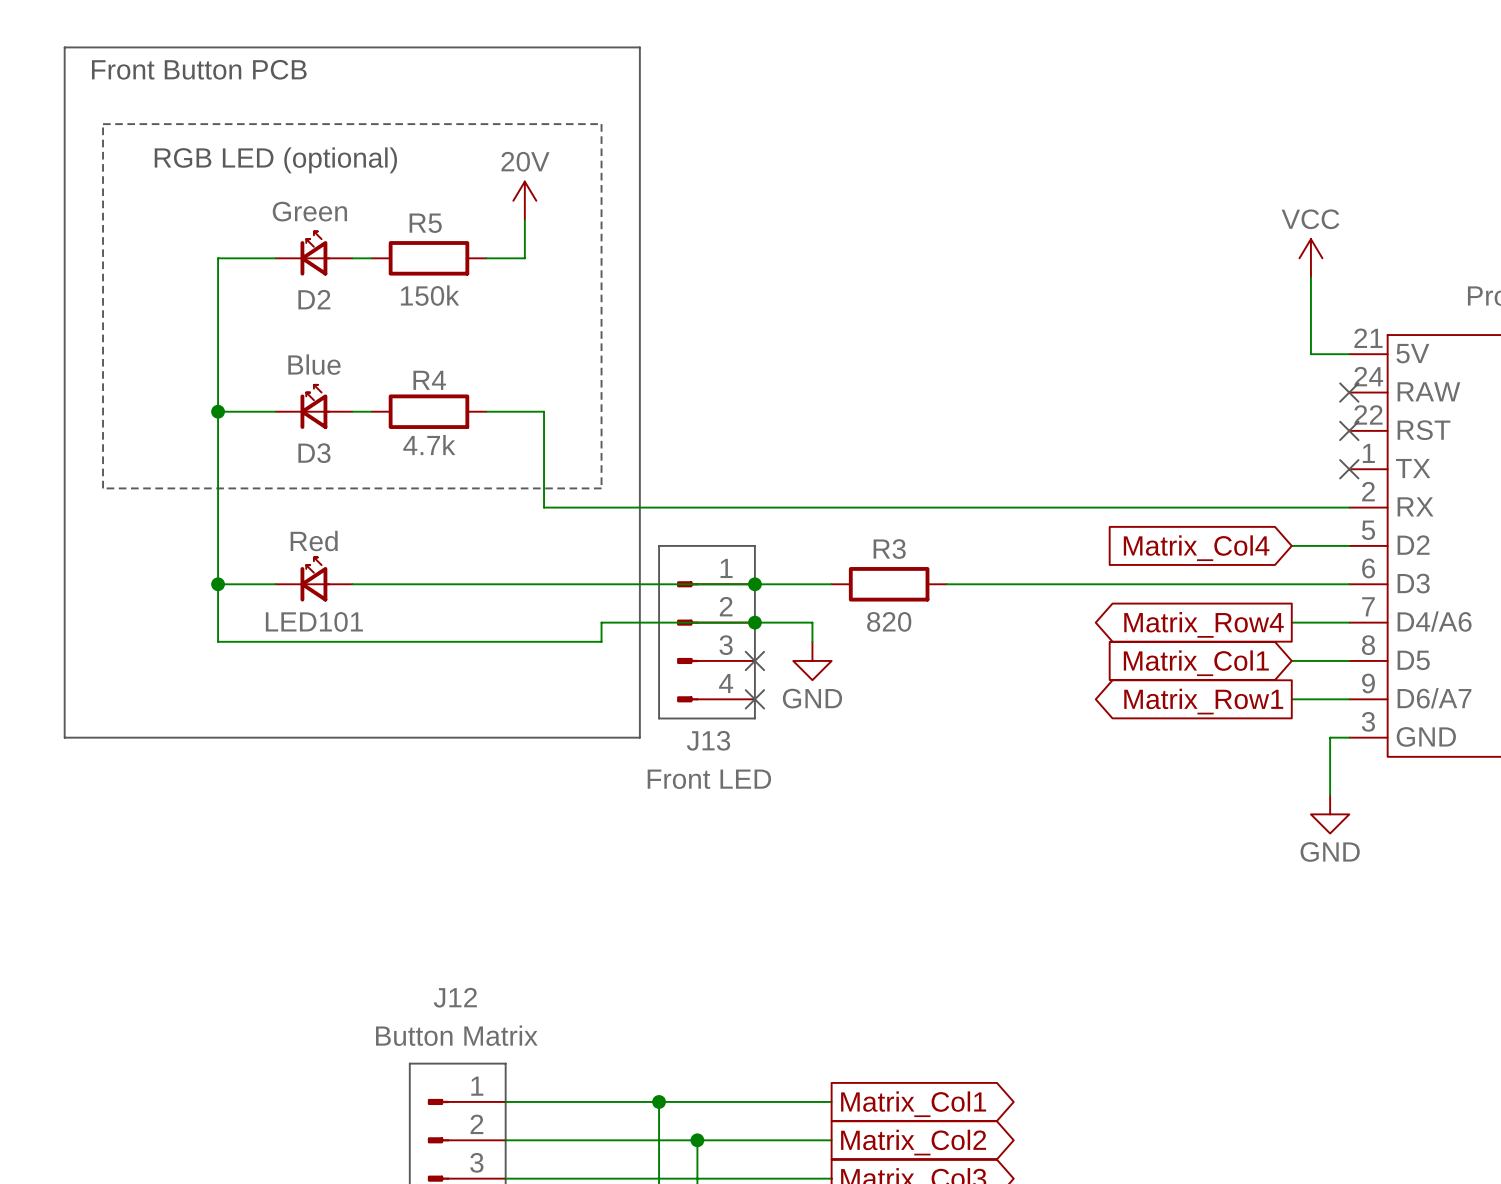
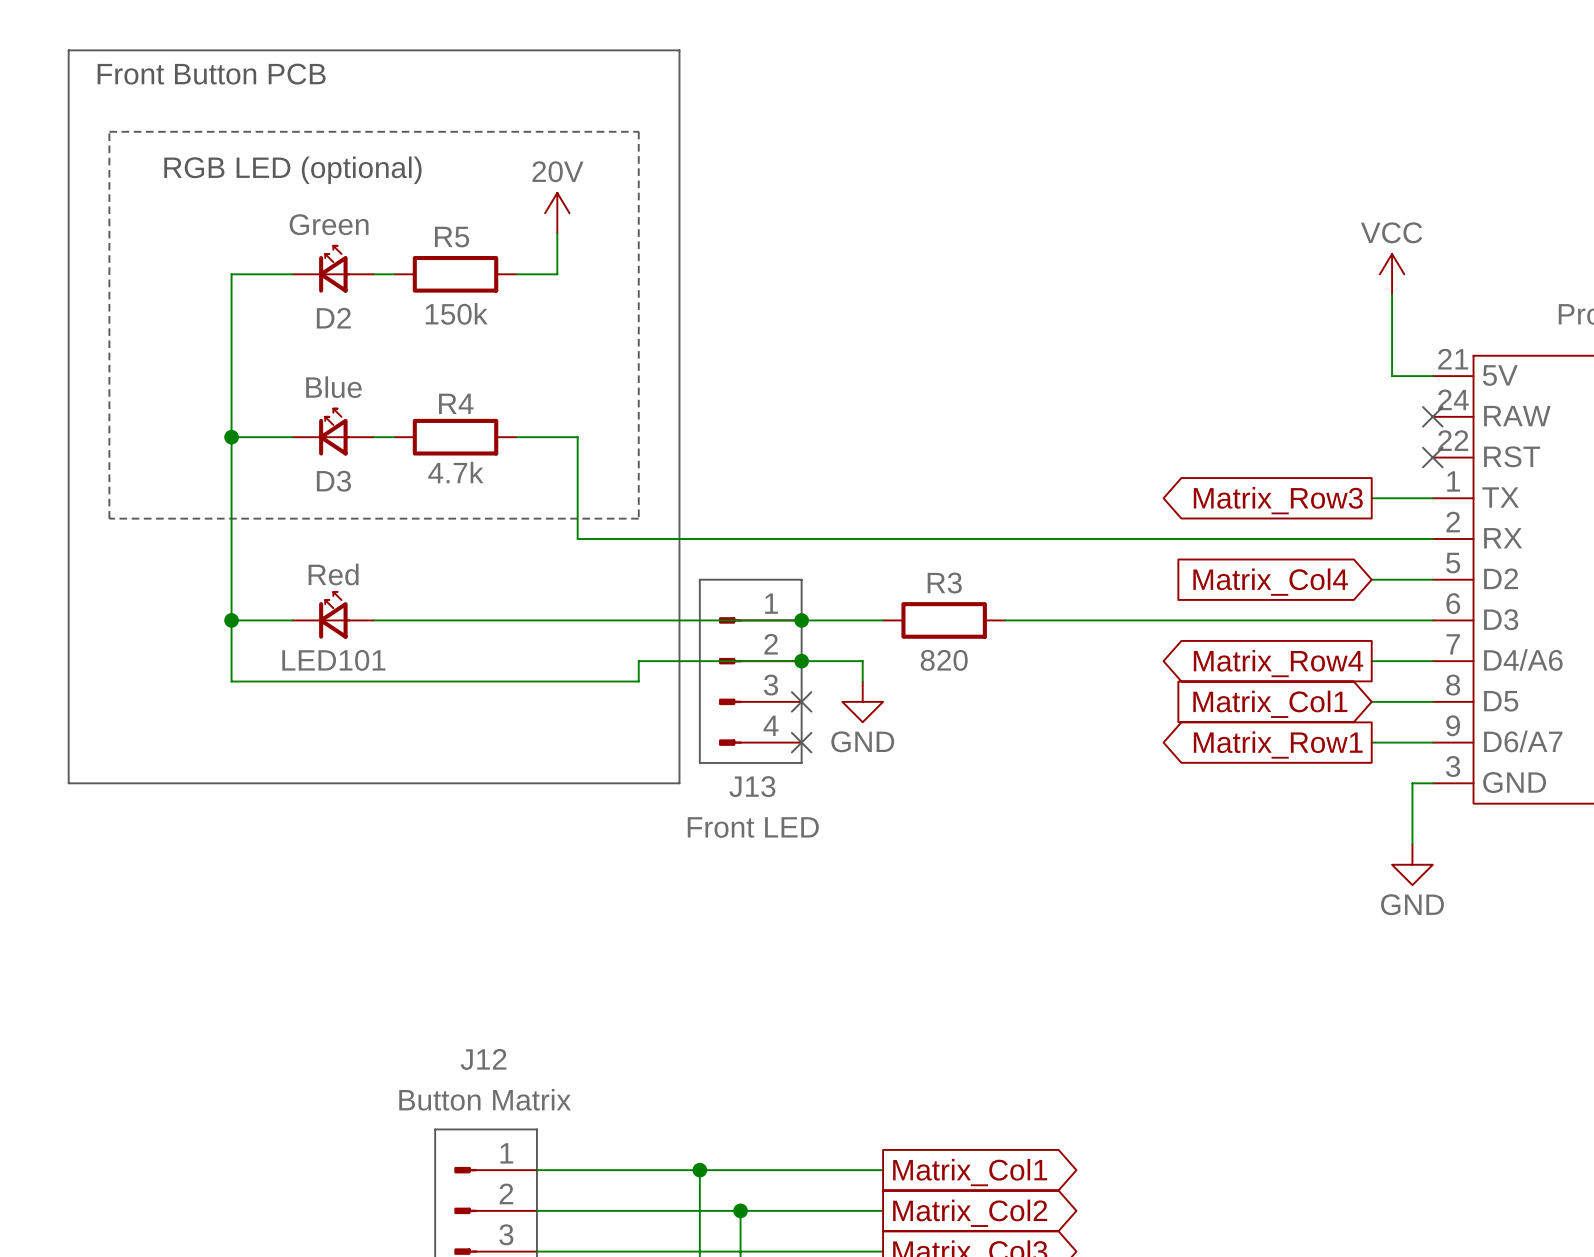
wire: none -> (1371, 498) (1432, 498)
no-connect mark: (1349, 469) -> none
global label: none -> Matrix_Row3 (1278, 500)

